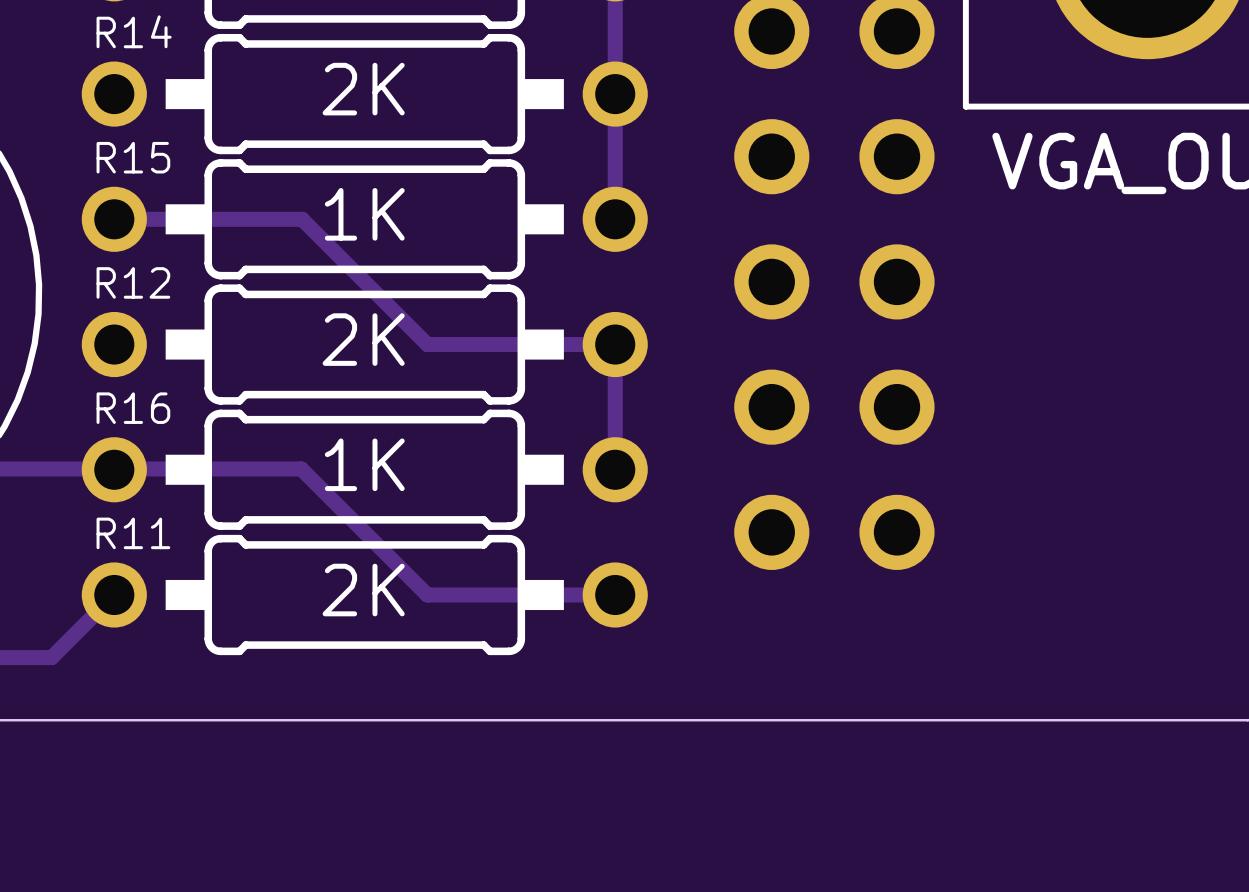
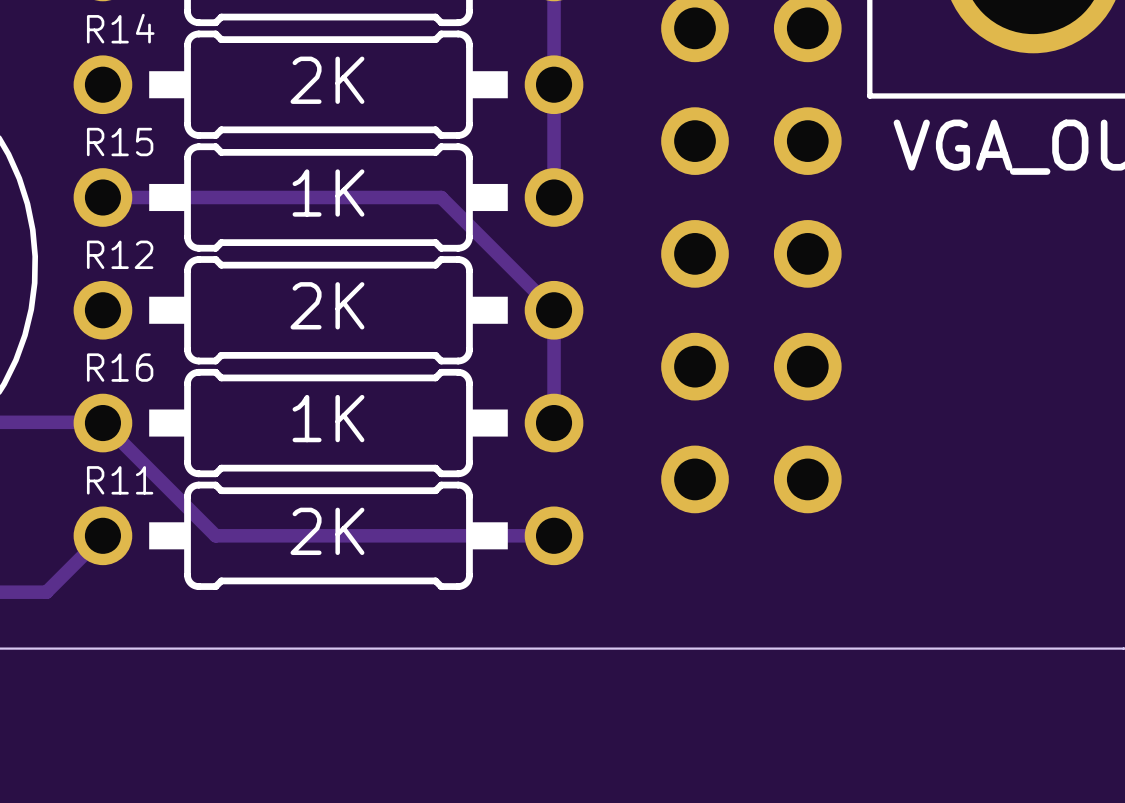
track: (302, 219) (427, 344) (615, 344) -> (272, 197) (441, 197) (554, 310)
track: (113, 468) (301, 468) (427, 595) -> (102, 422) (215, 535) (384, 535)

